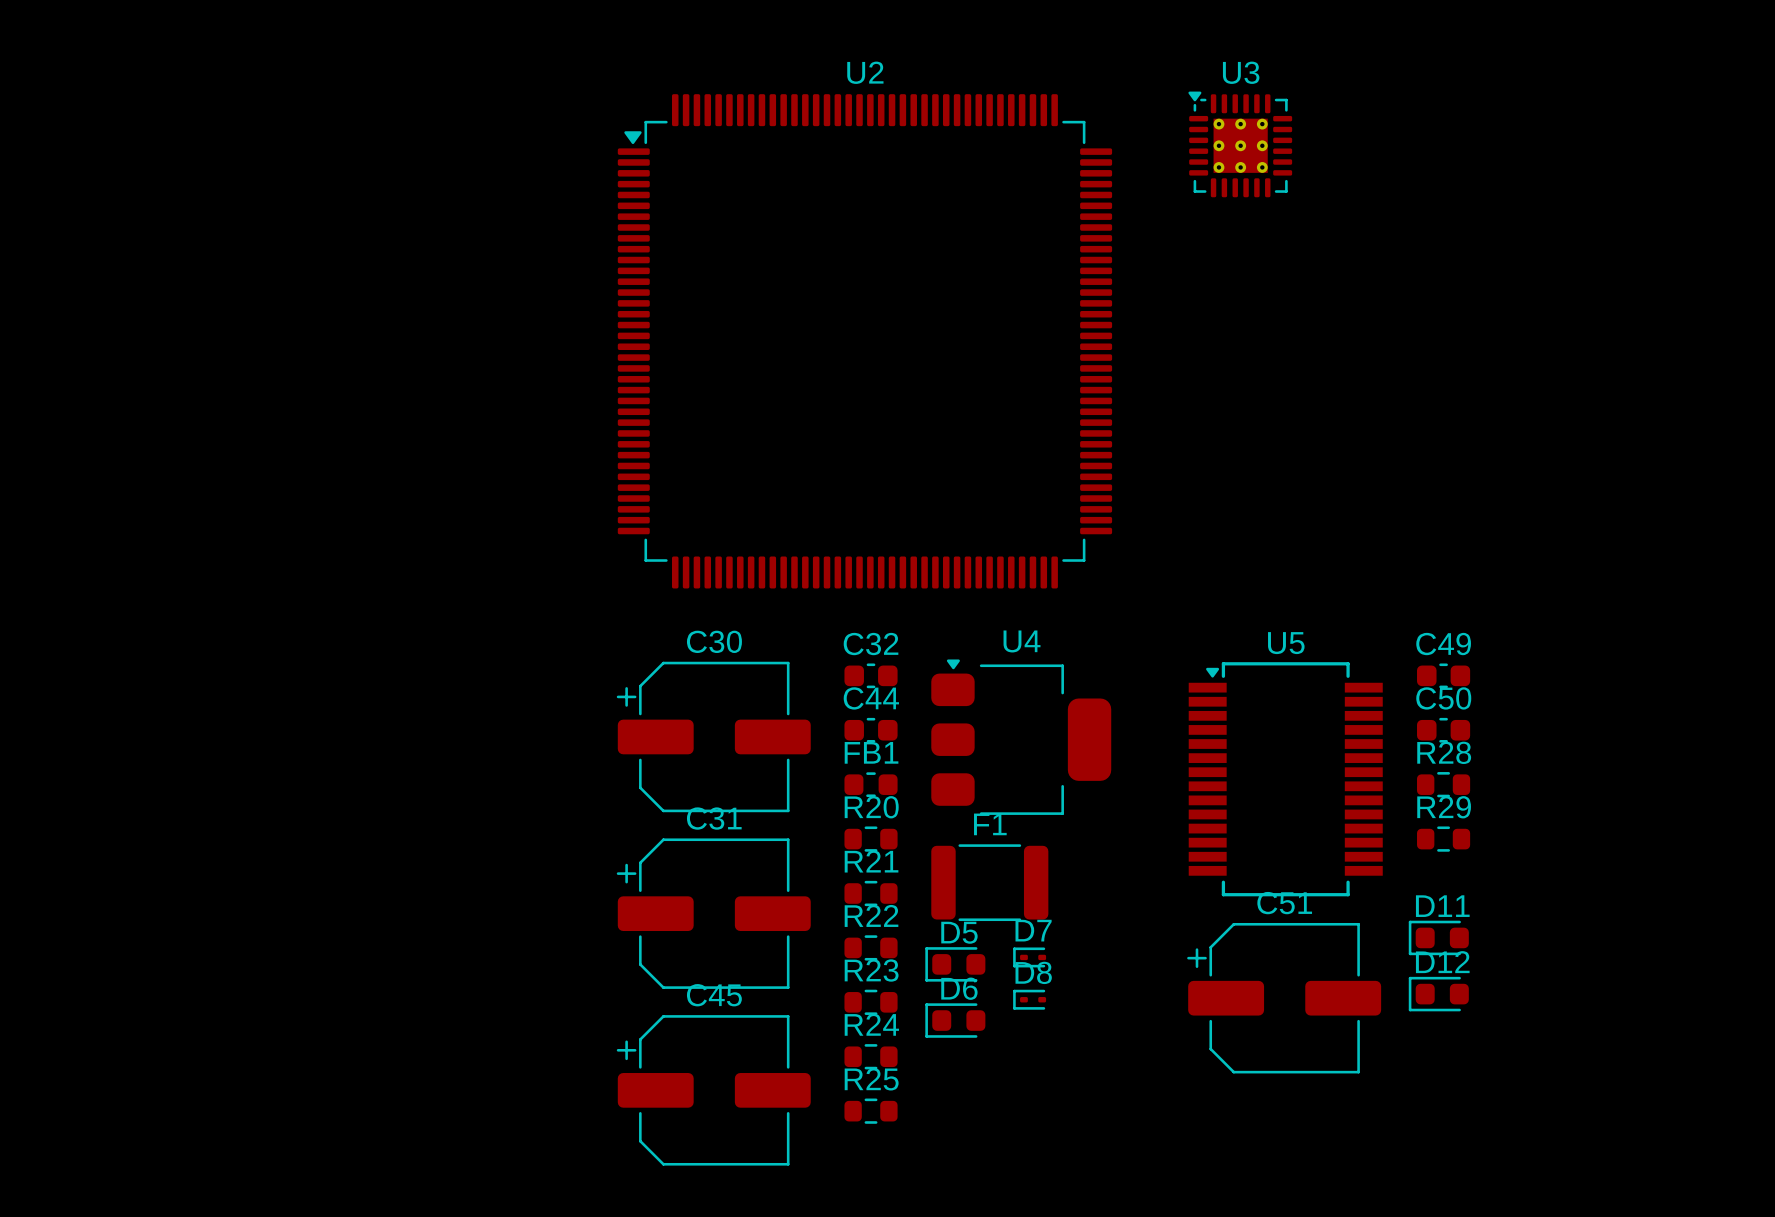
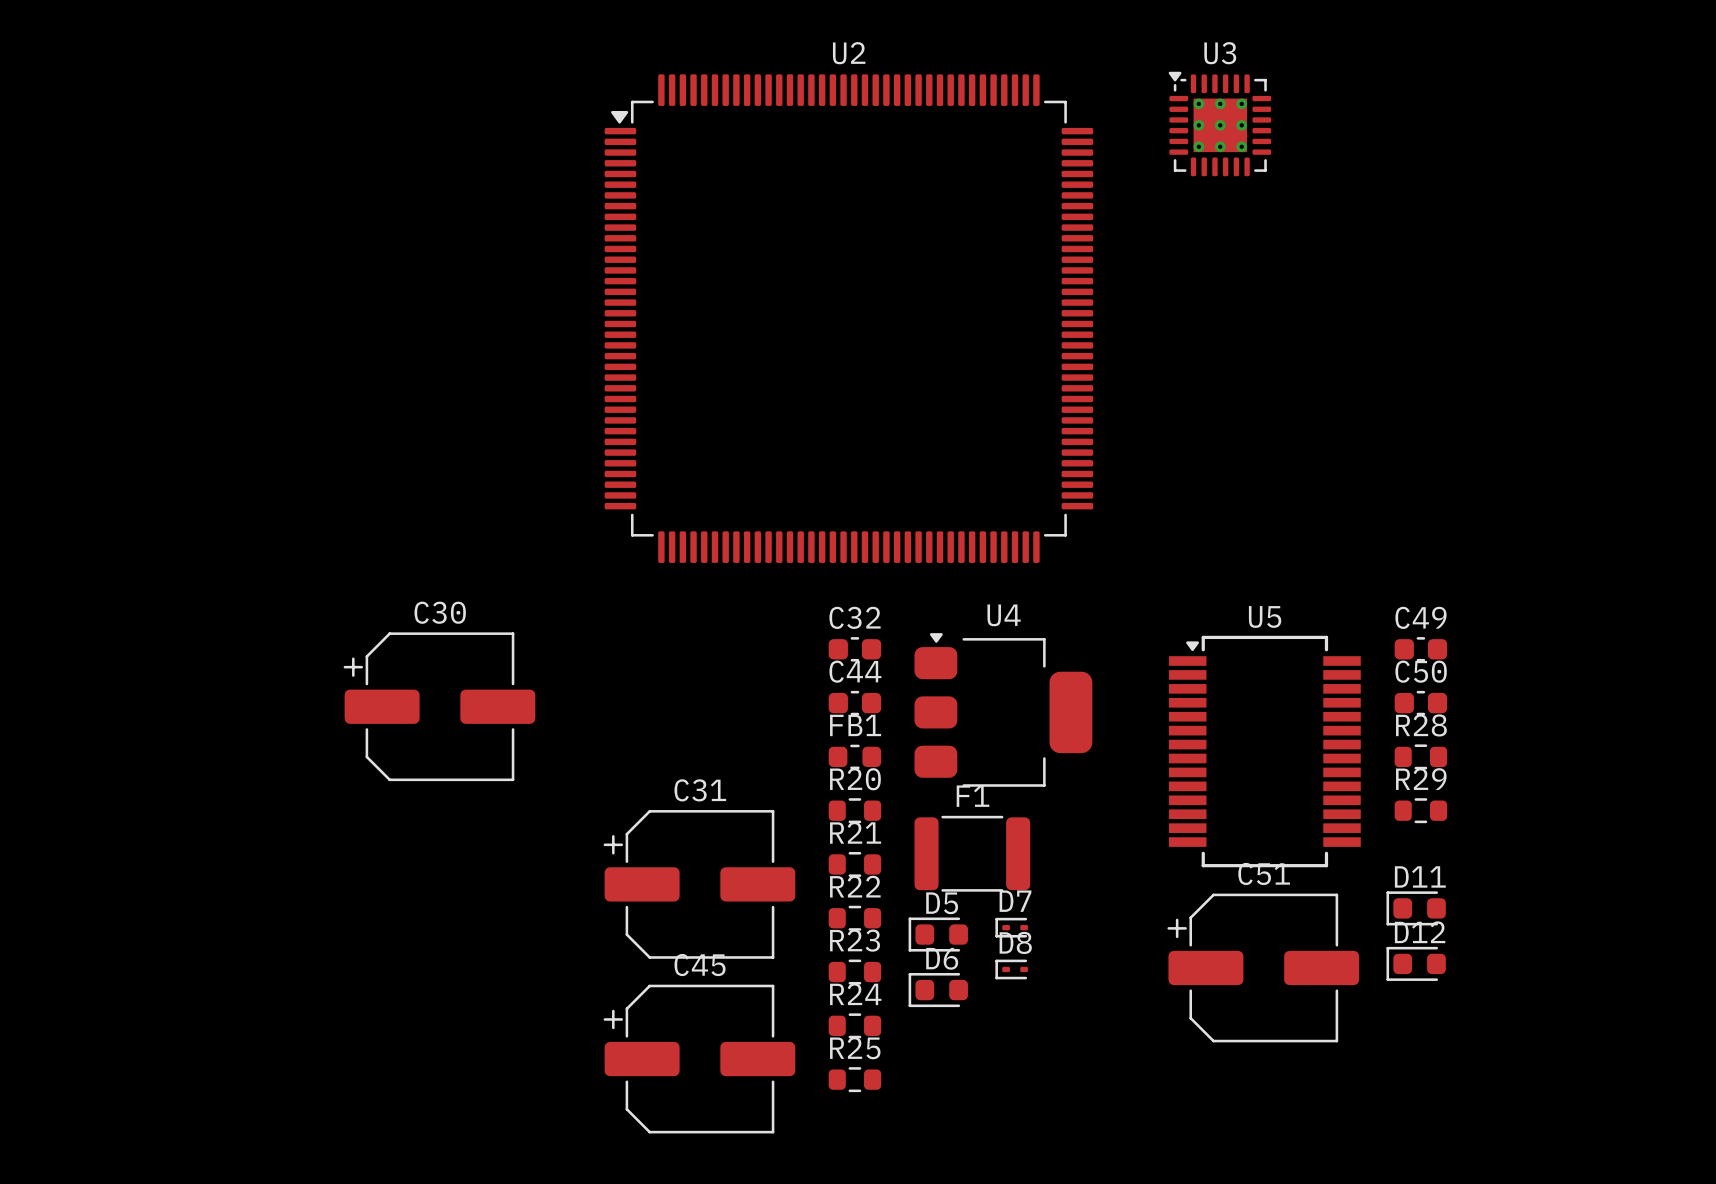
C30 position: (713, 736) -> (439, 706)

